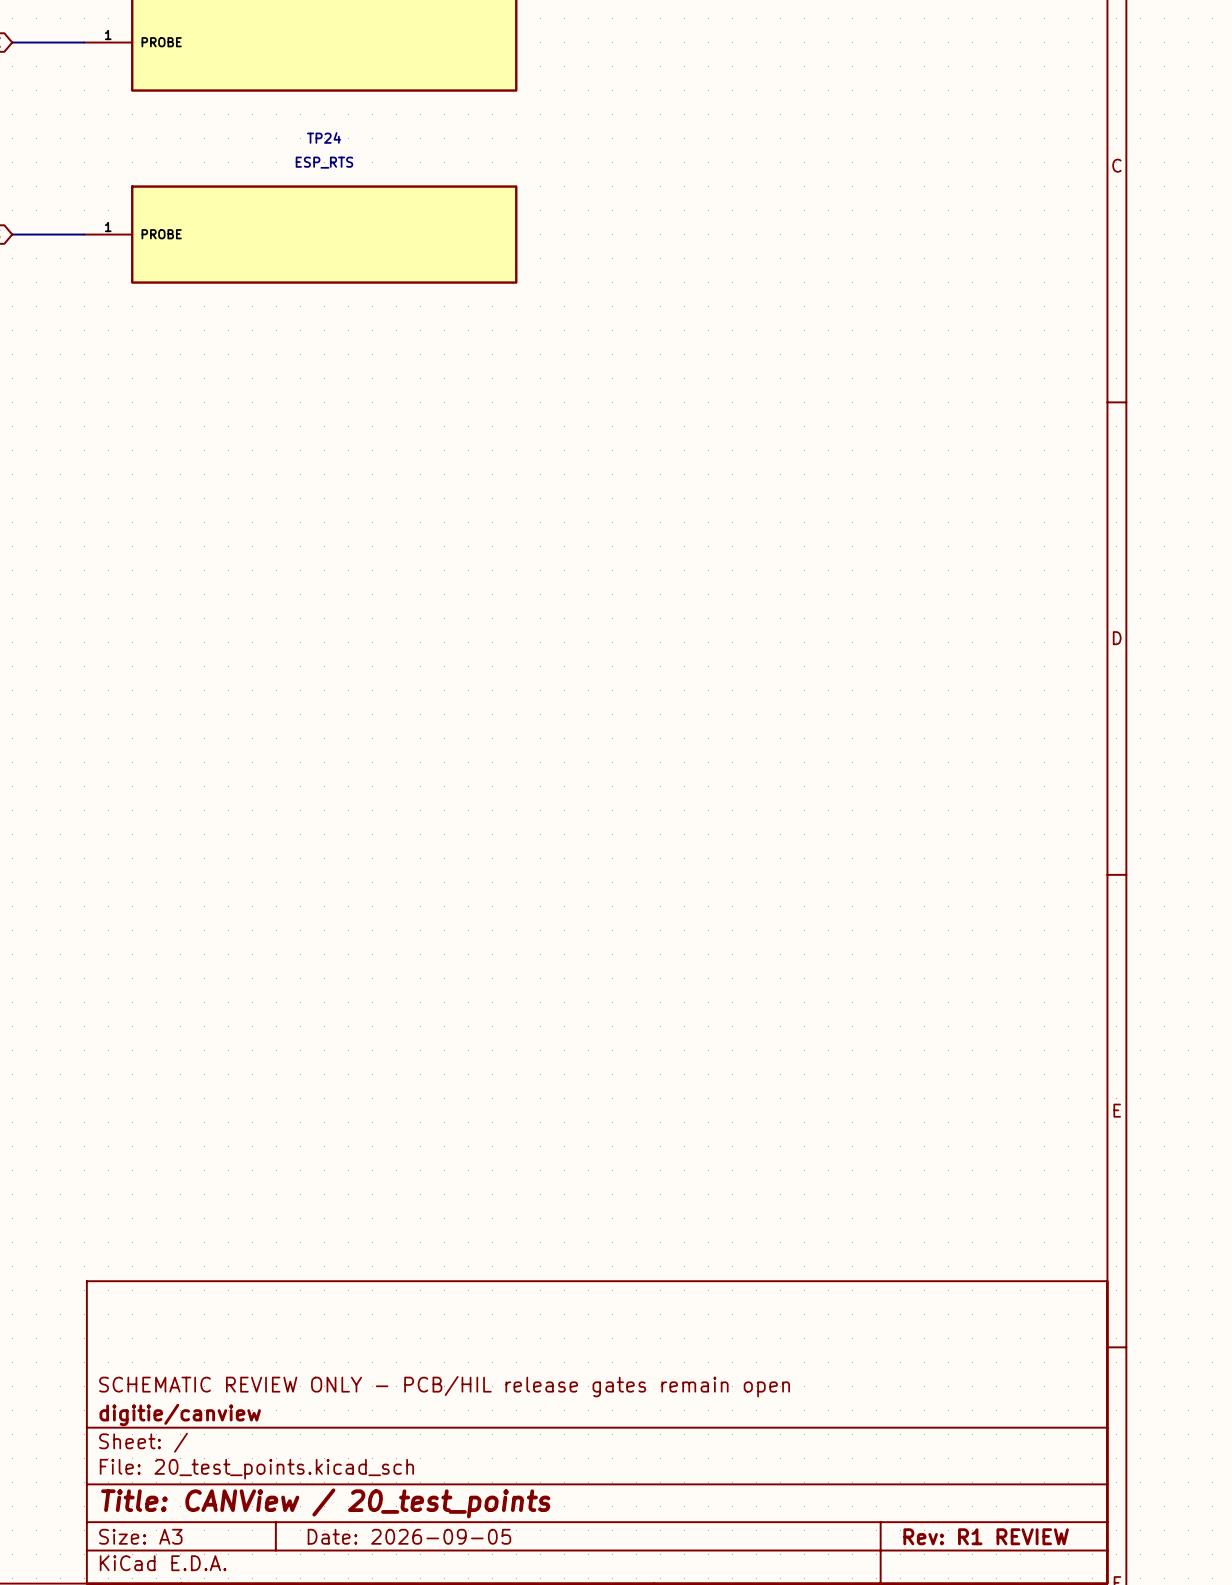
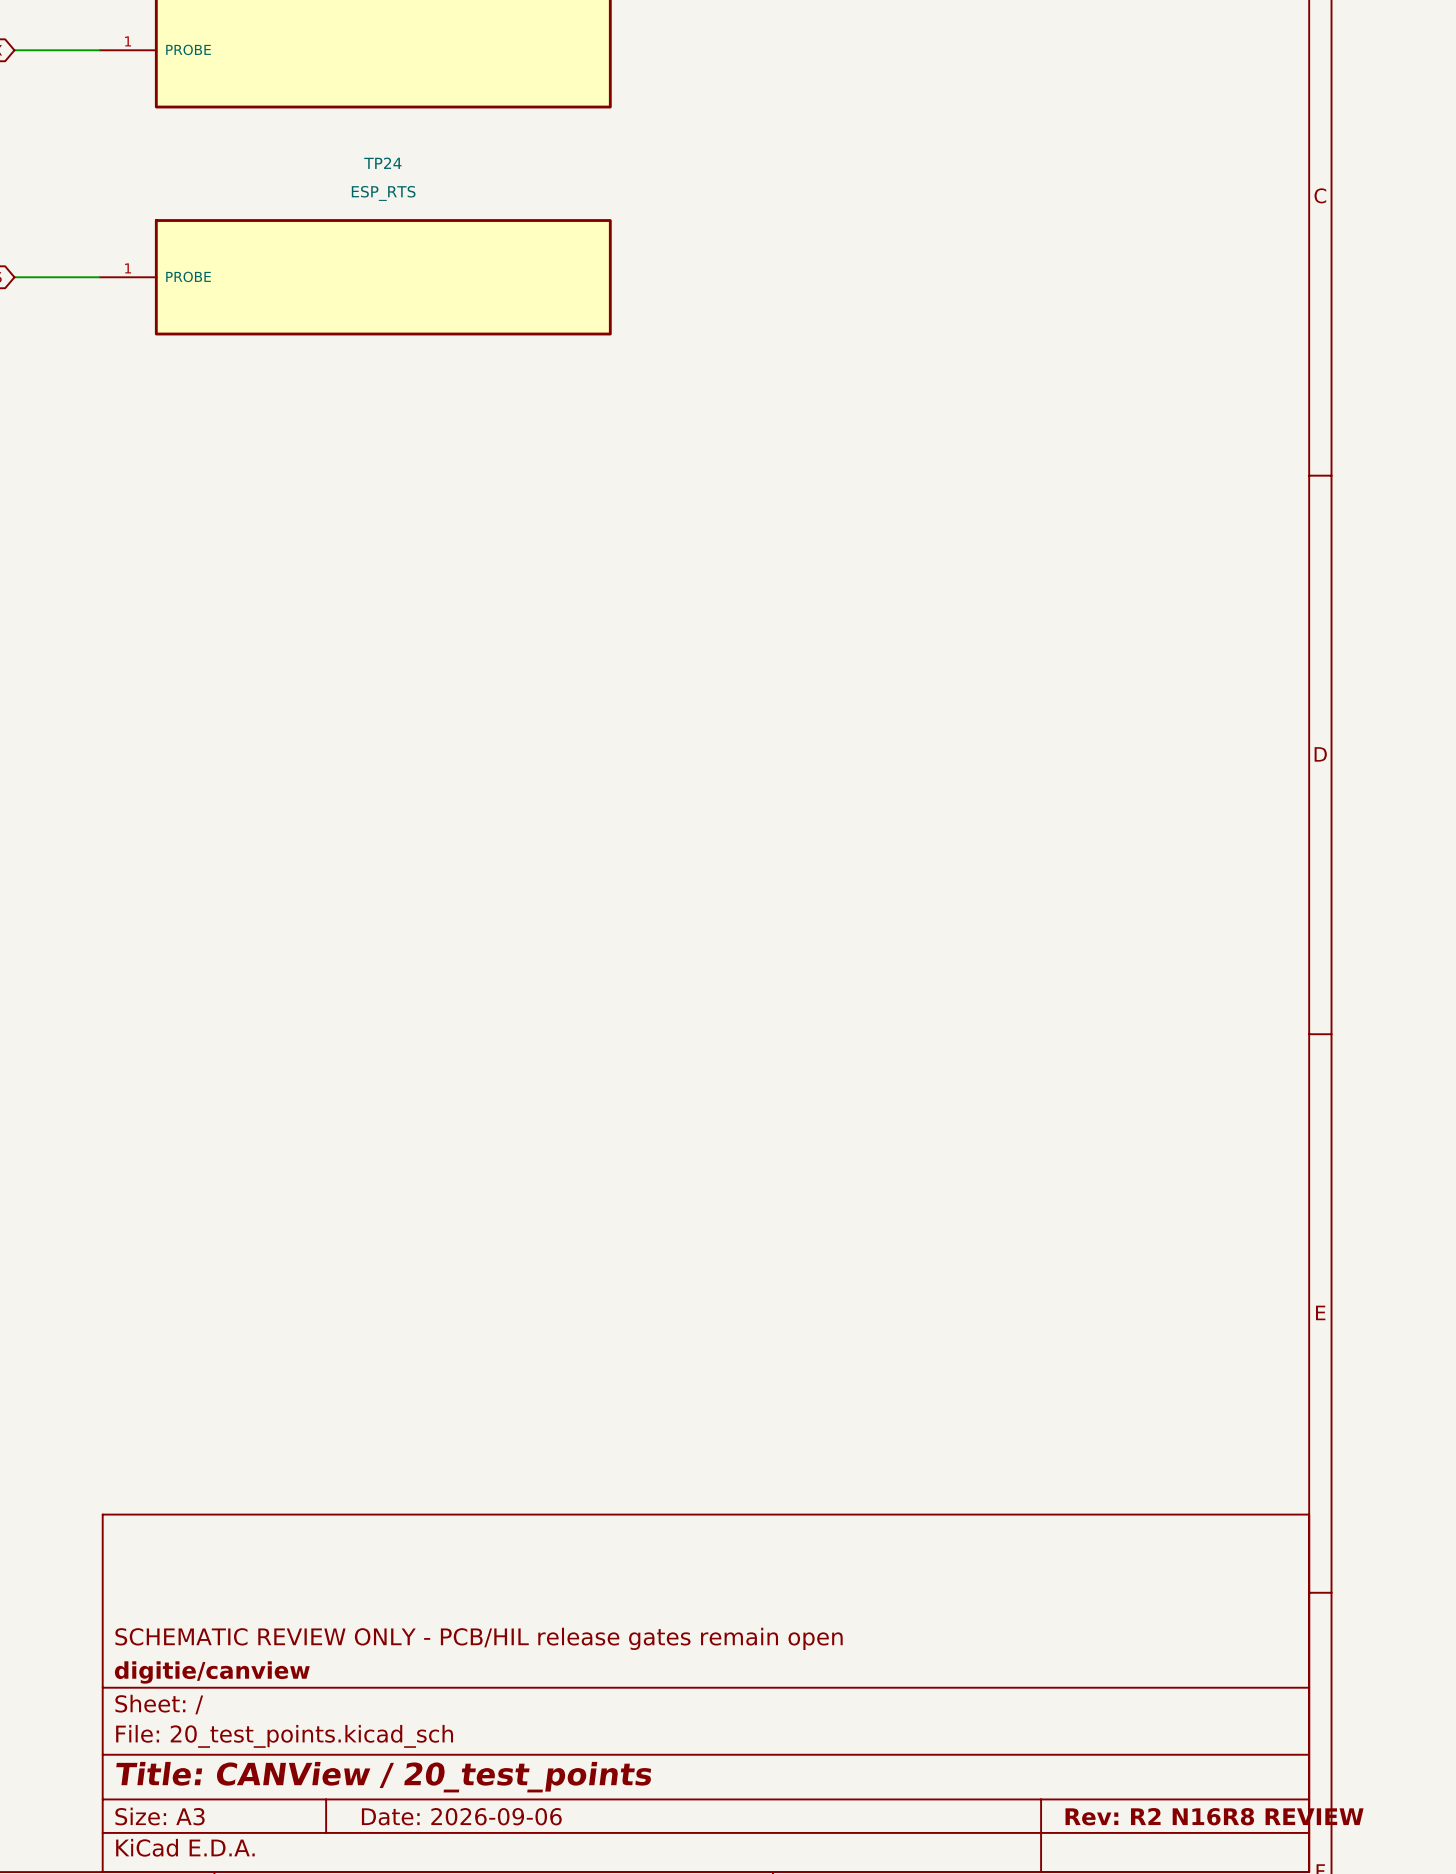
title block: Date: 2026-09-05 (409, 1536) -> Date: 2026-09-06 (461, 1816)
title block: Rev: R1 REVIEW (986, 1536) -> Rev: R2 N16R8 REVIEW (1214, 1816)

